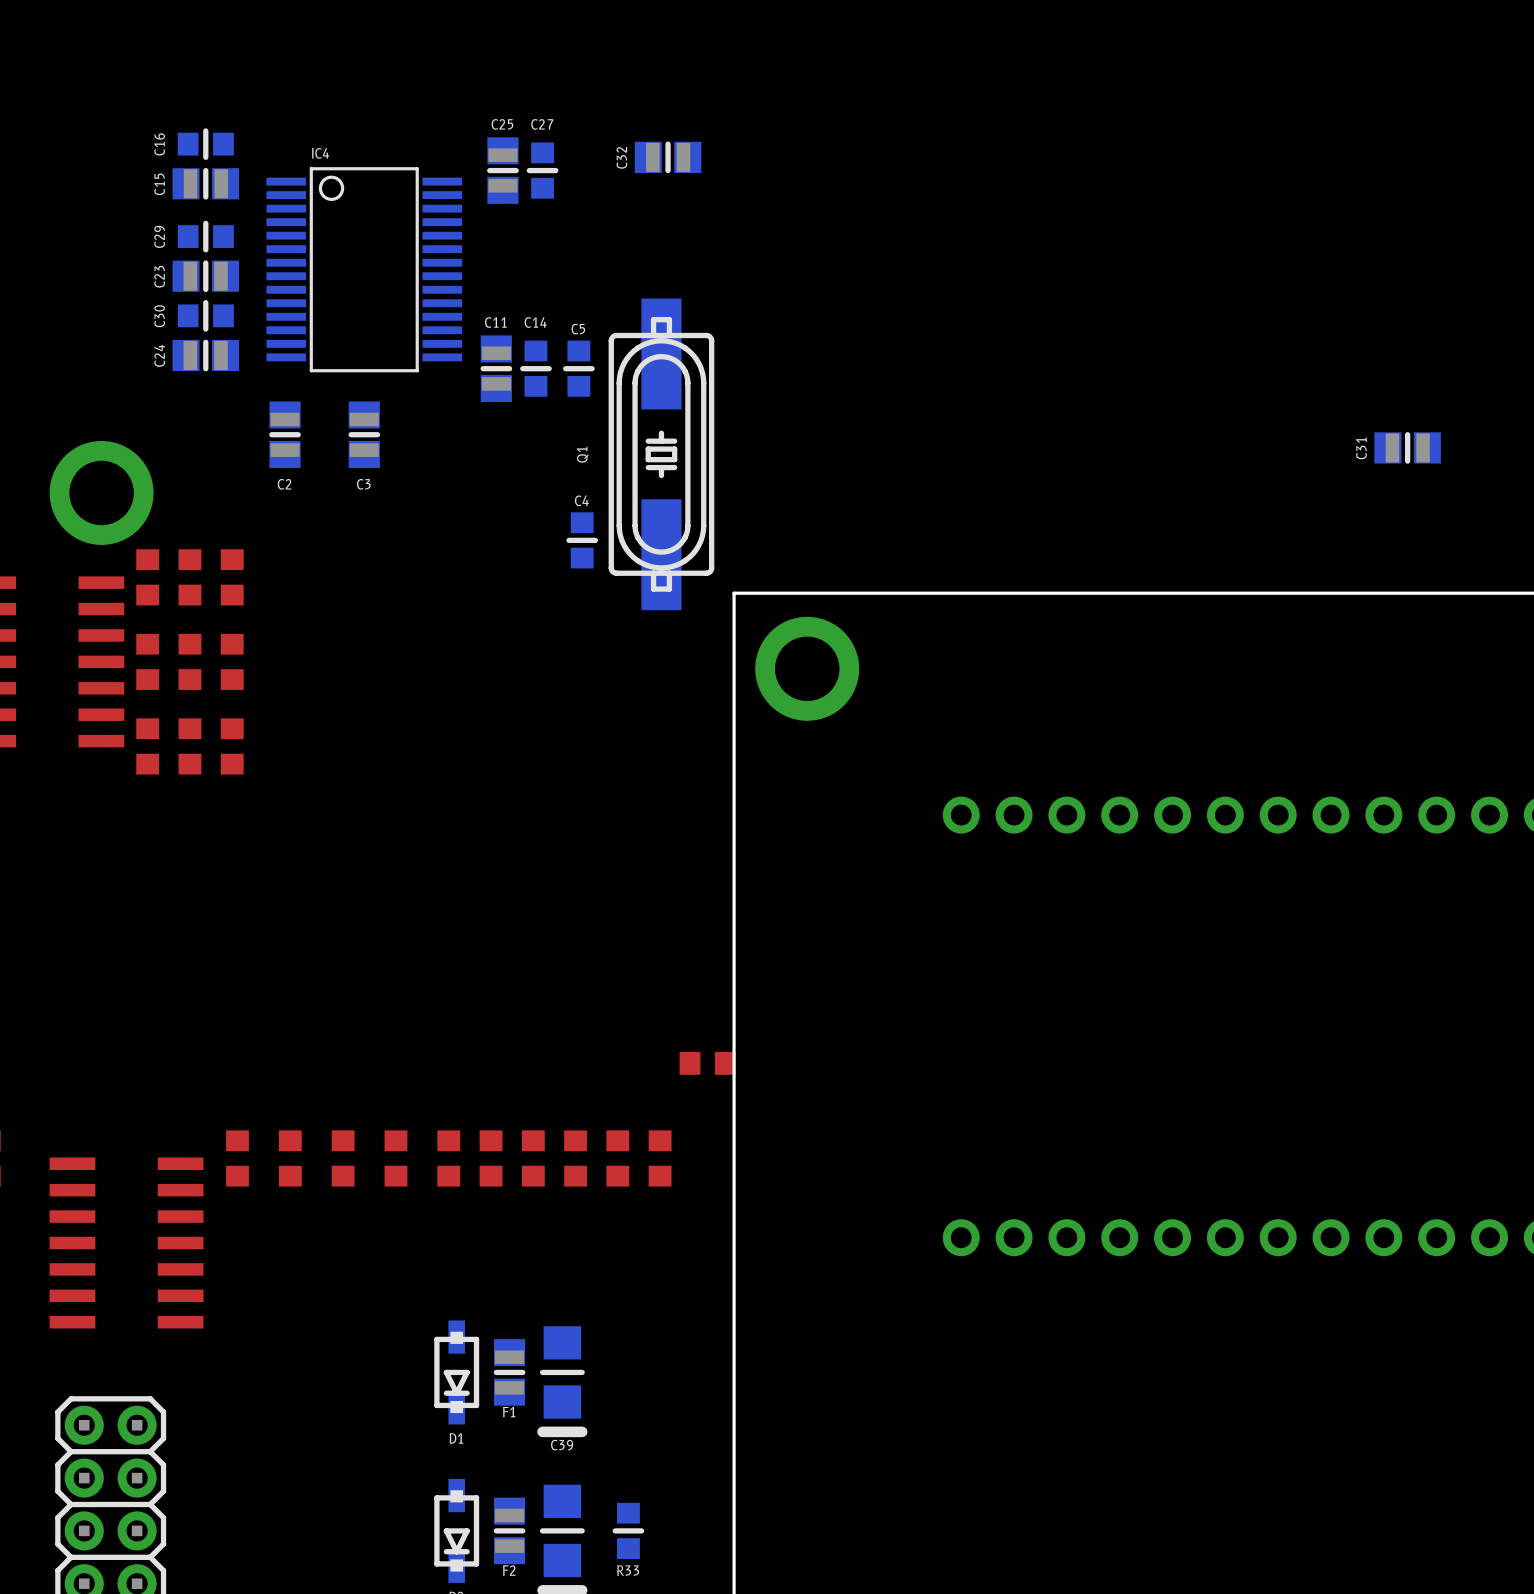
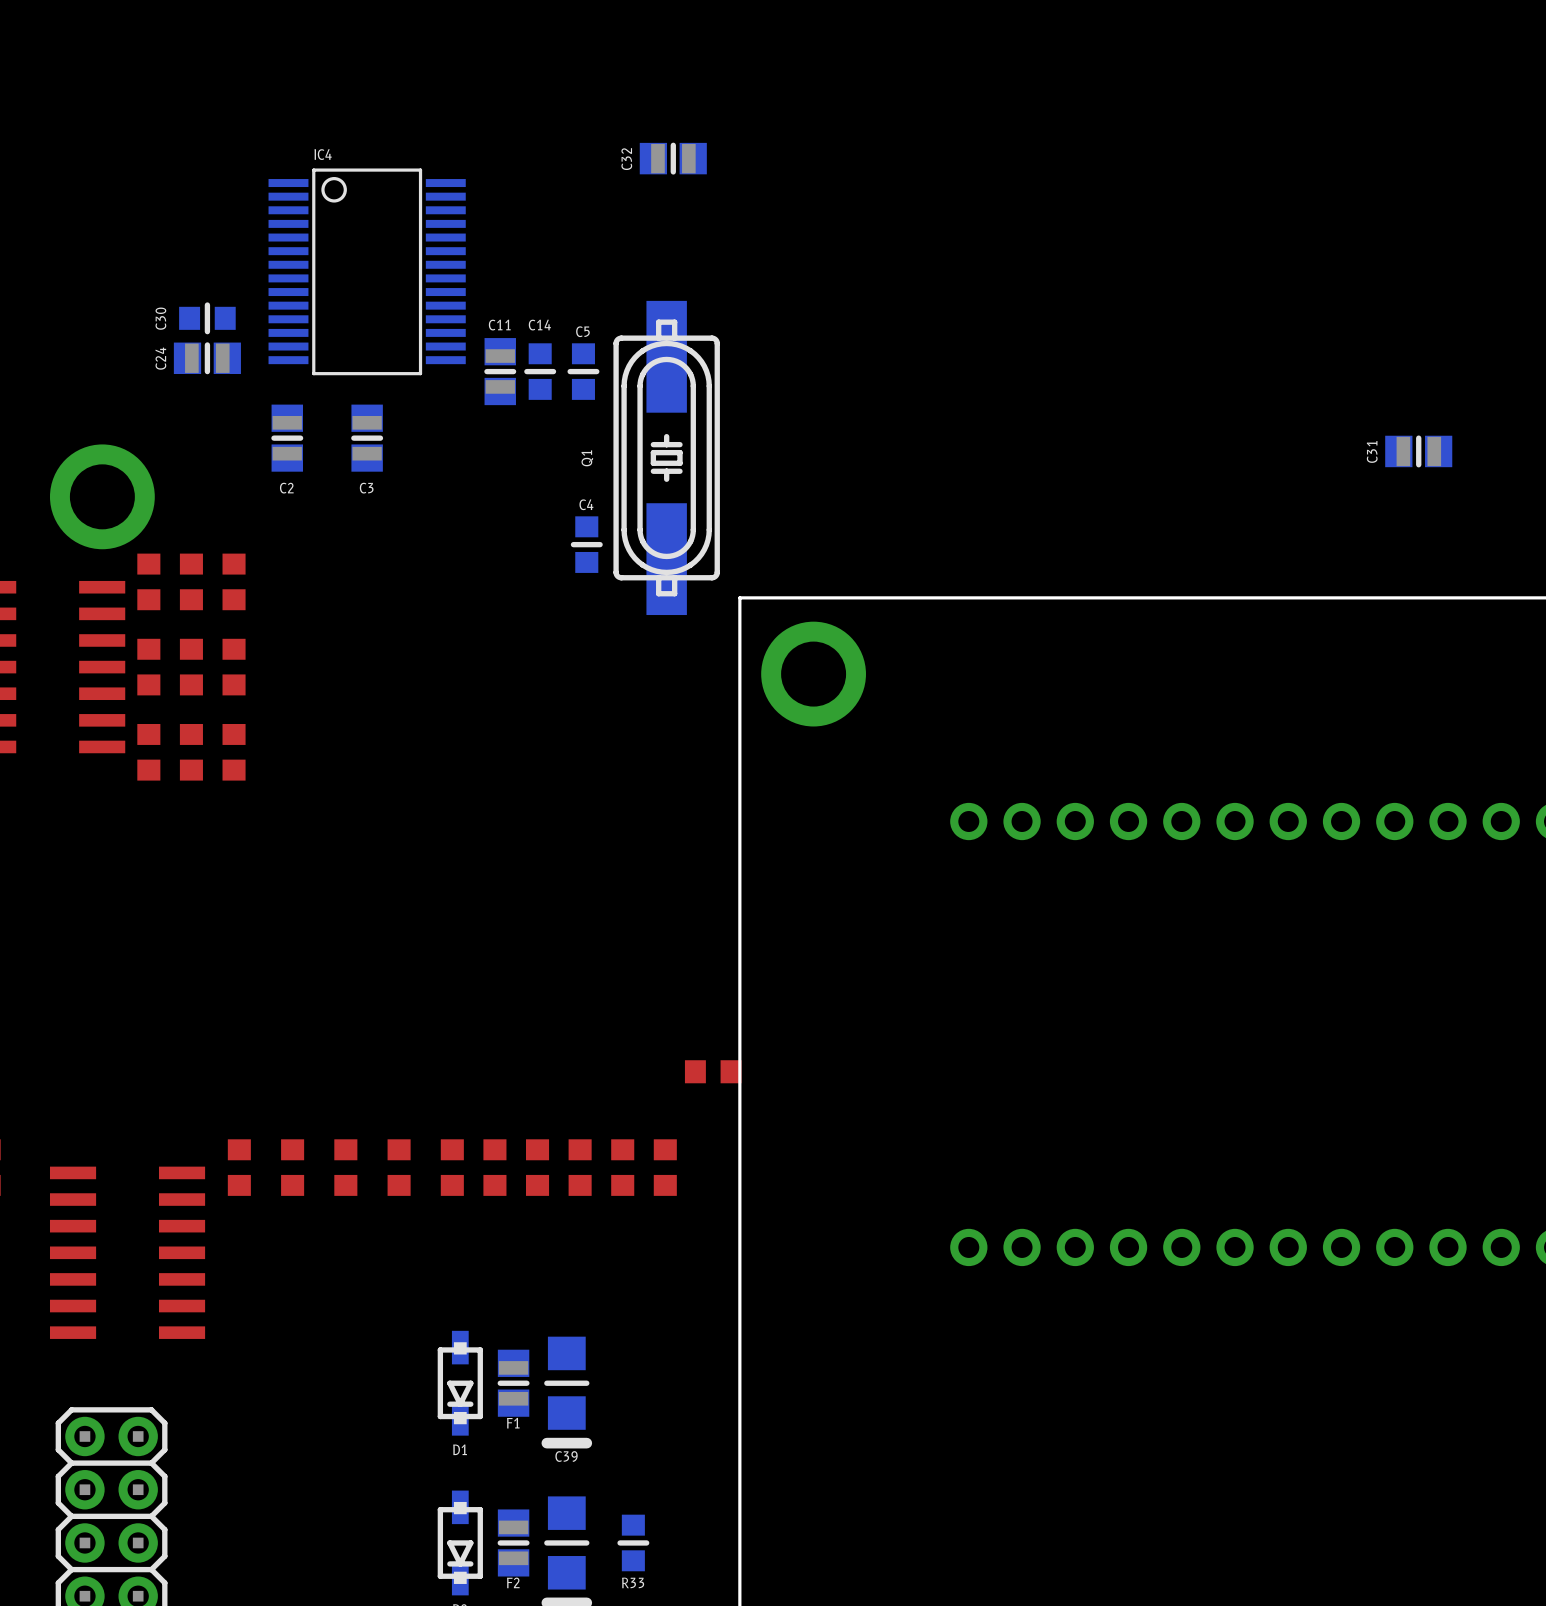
C16: (205, 144) -> none
C25: (502, 170) -> none
C27: (542, 170) -> none
C15: (205, 183) -> none
C29: (205, 236) -> none
C23: (205, 276) -> none

